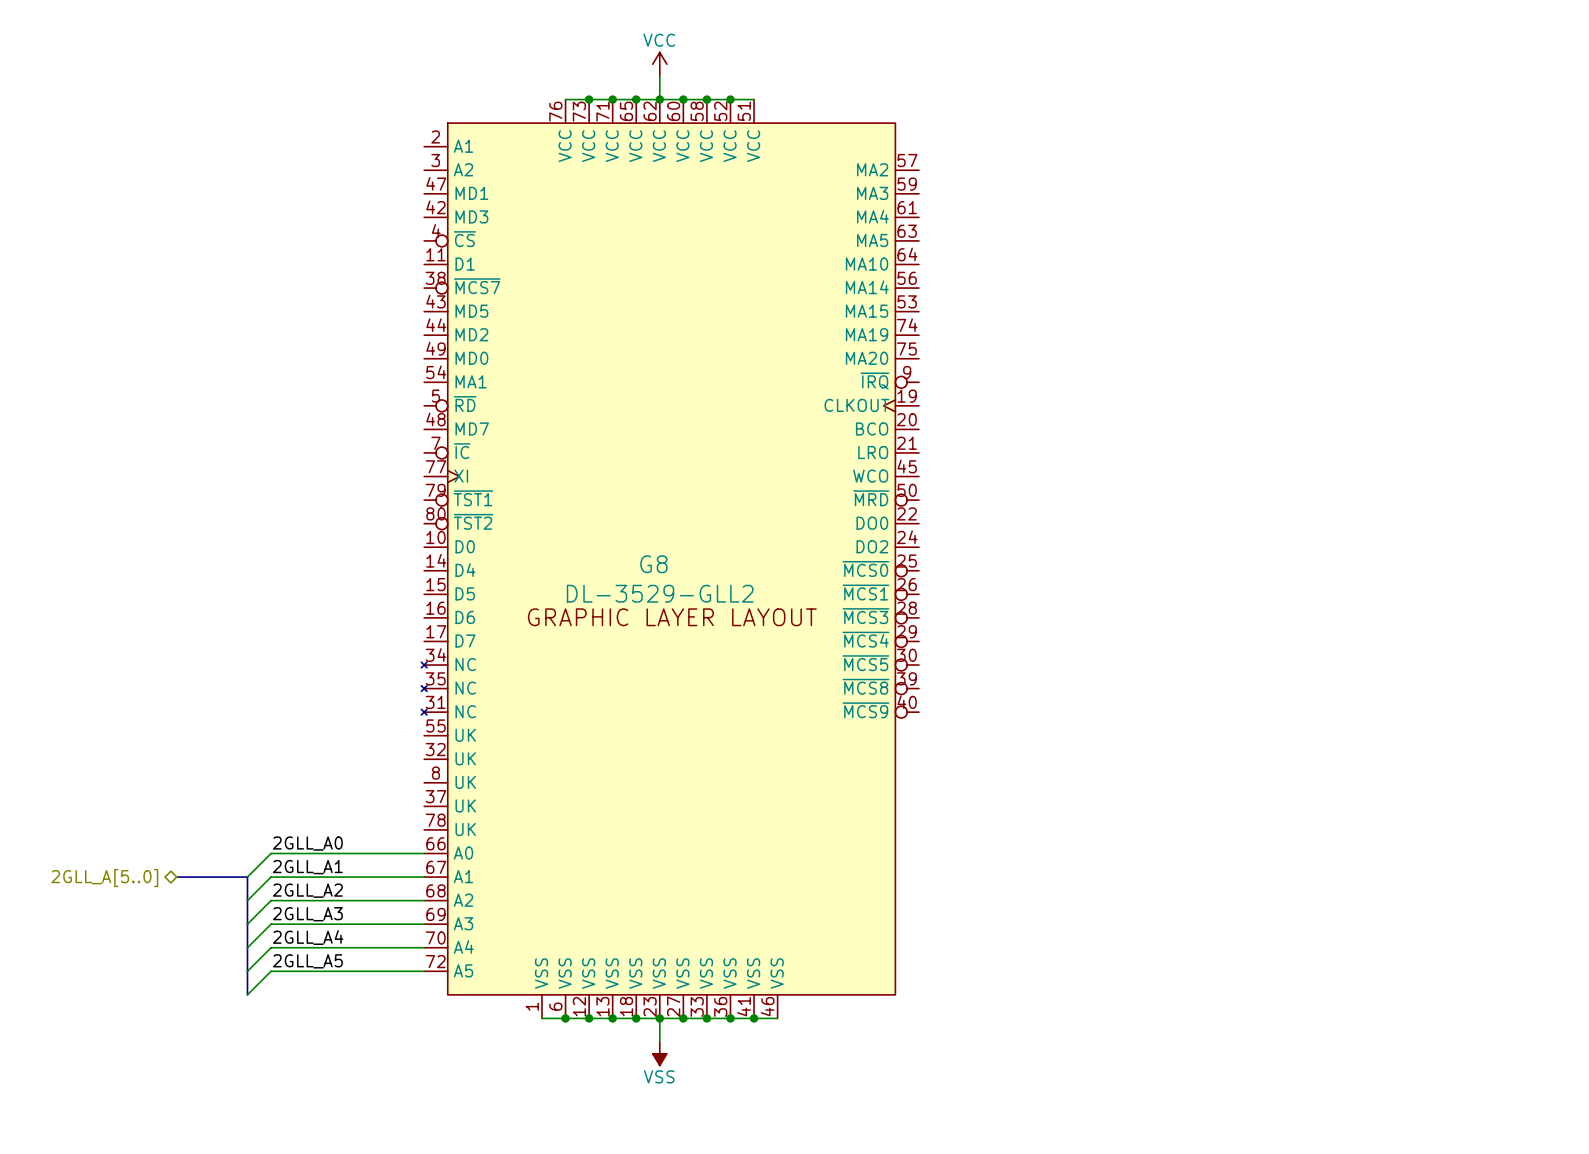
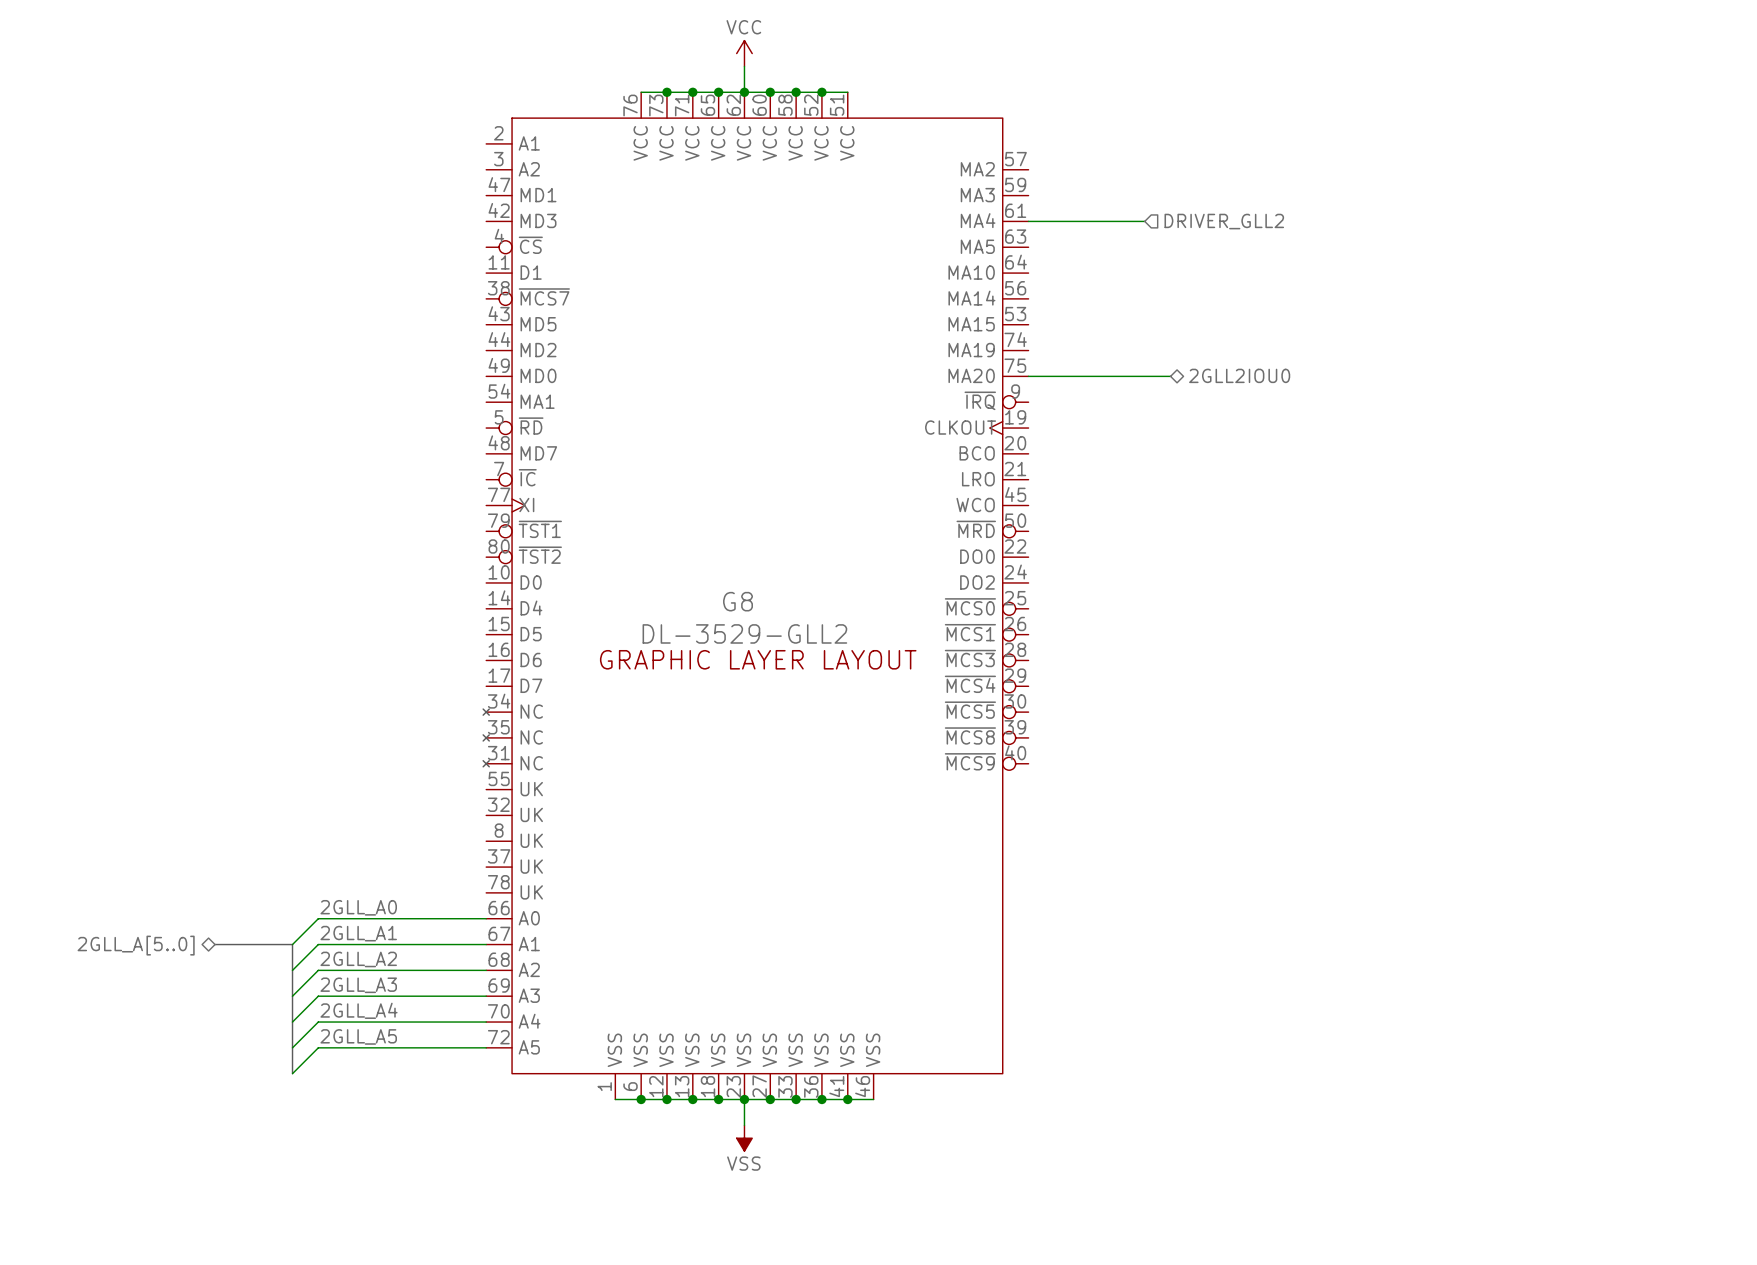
wire: none -> (1028, 221) (1144, 221)
hierarchical label: none -> DRIVER_GLL2 (1224, 221)
wire: none -> (1028, 376) (1170, 376)
hierarchical label: none -> 2GLL2IOU0 (1239, 375)

